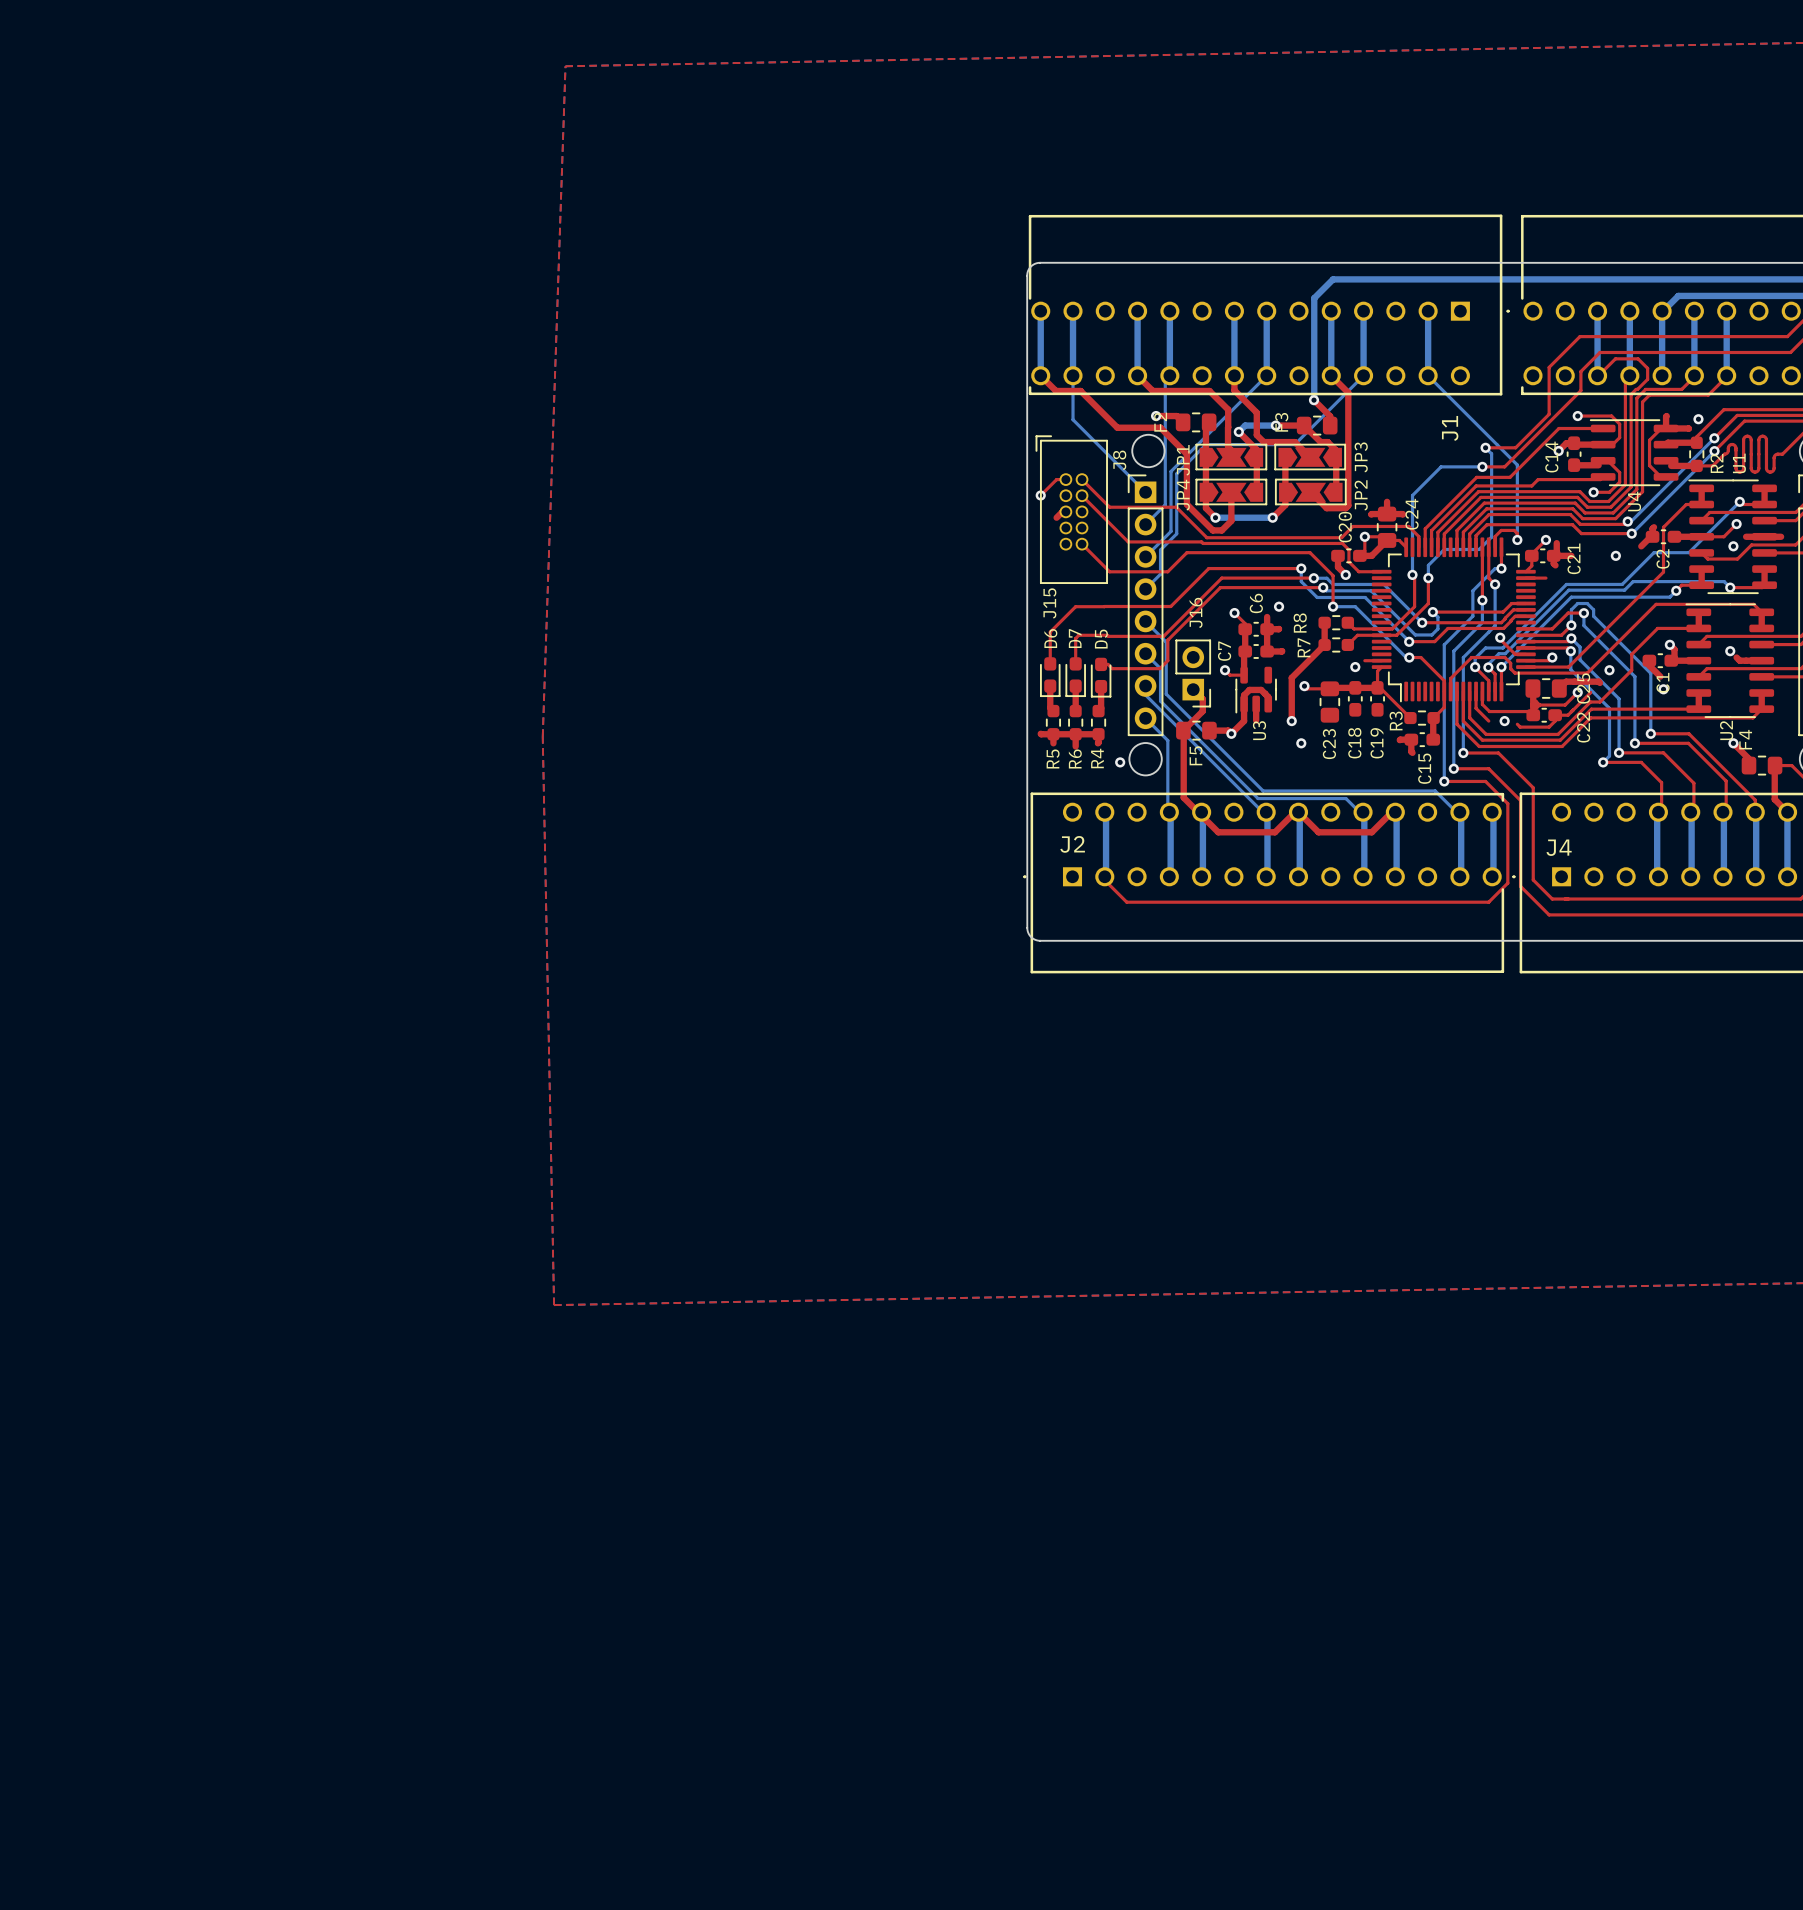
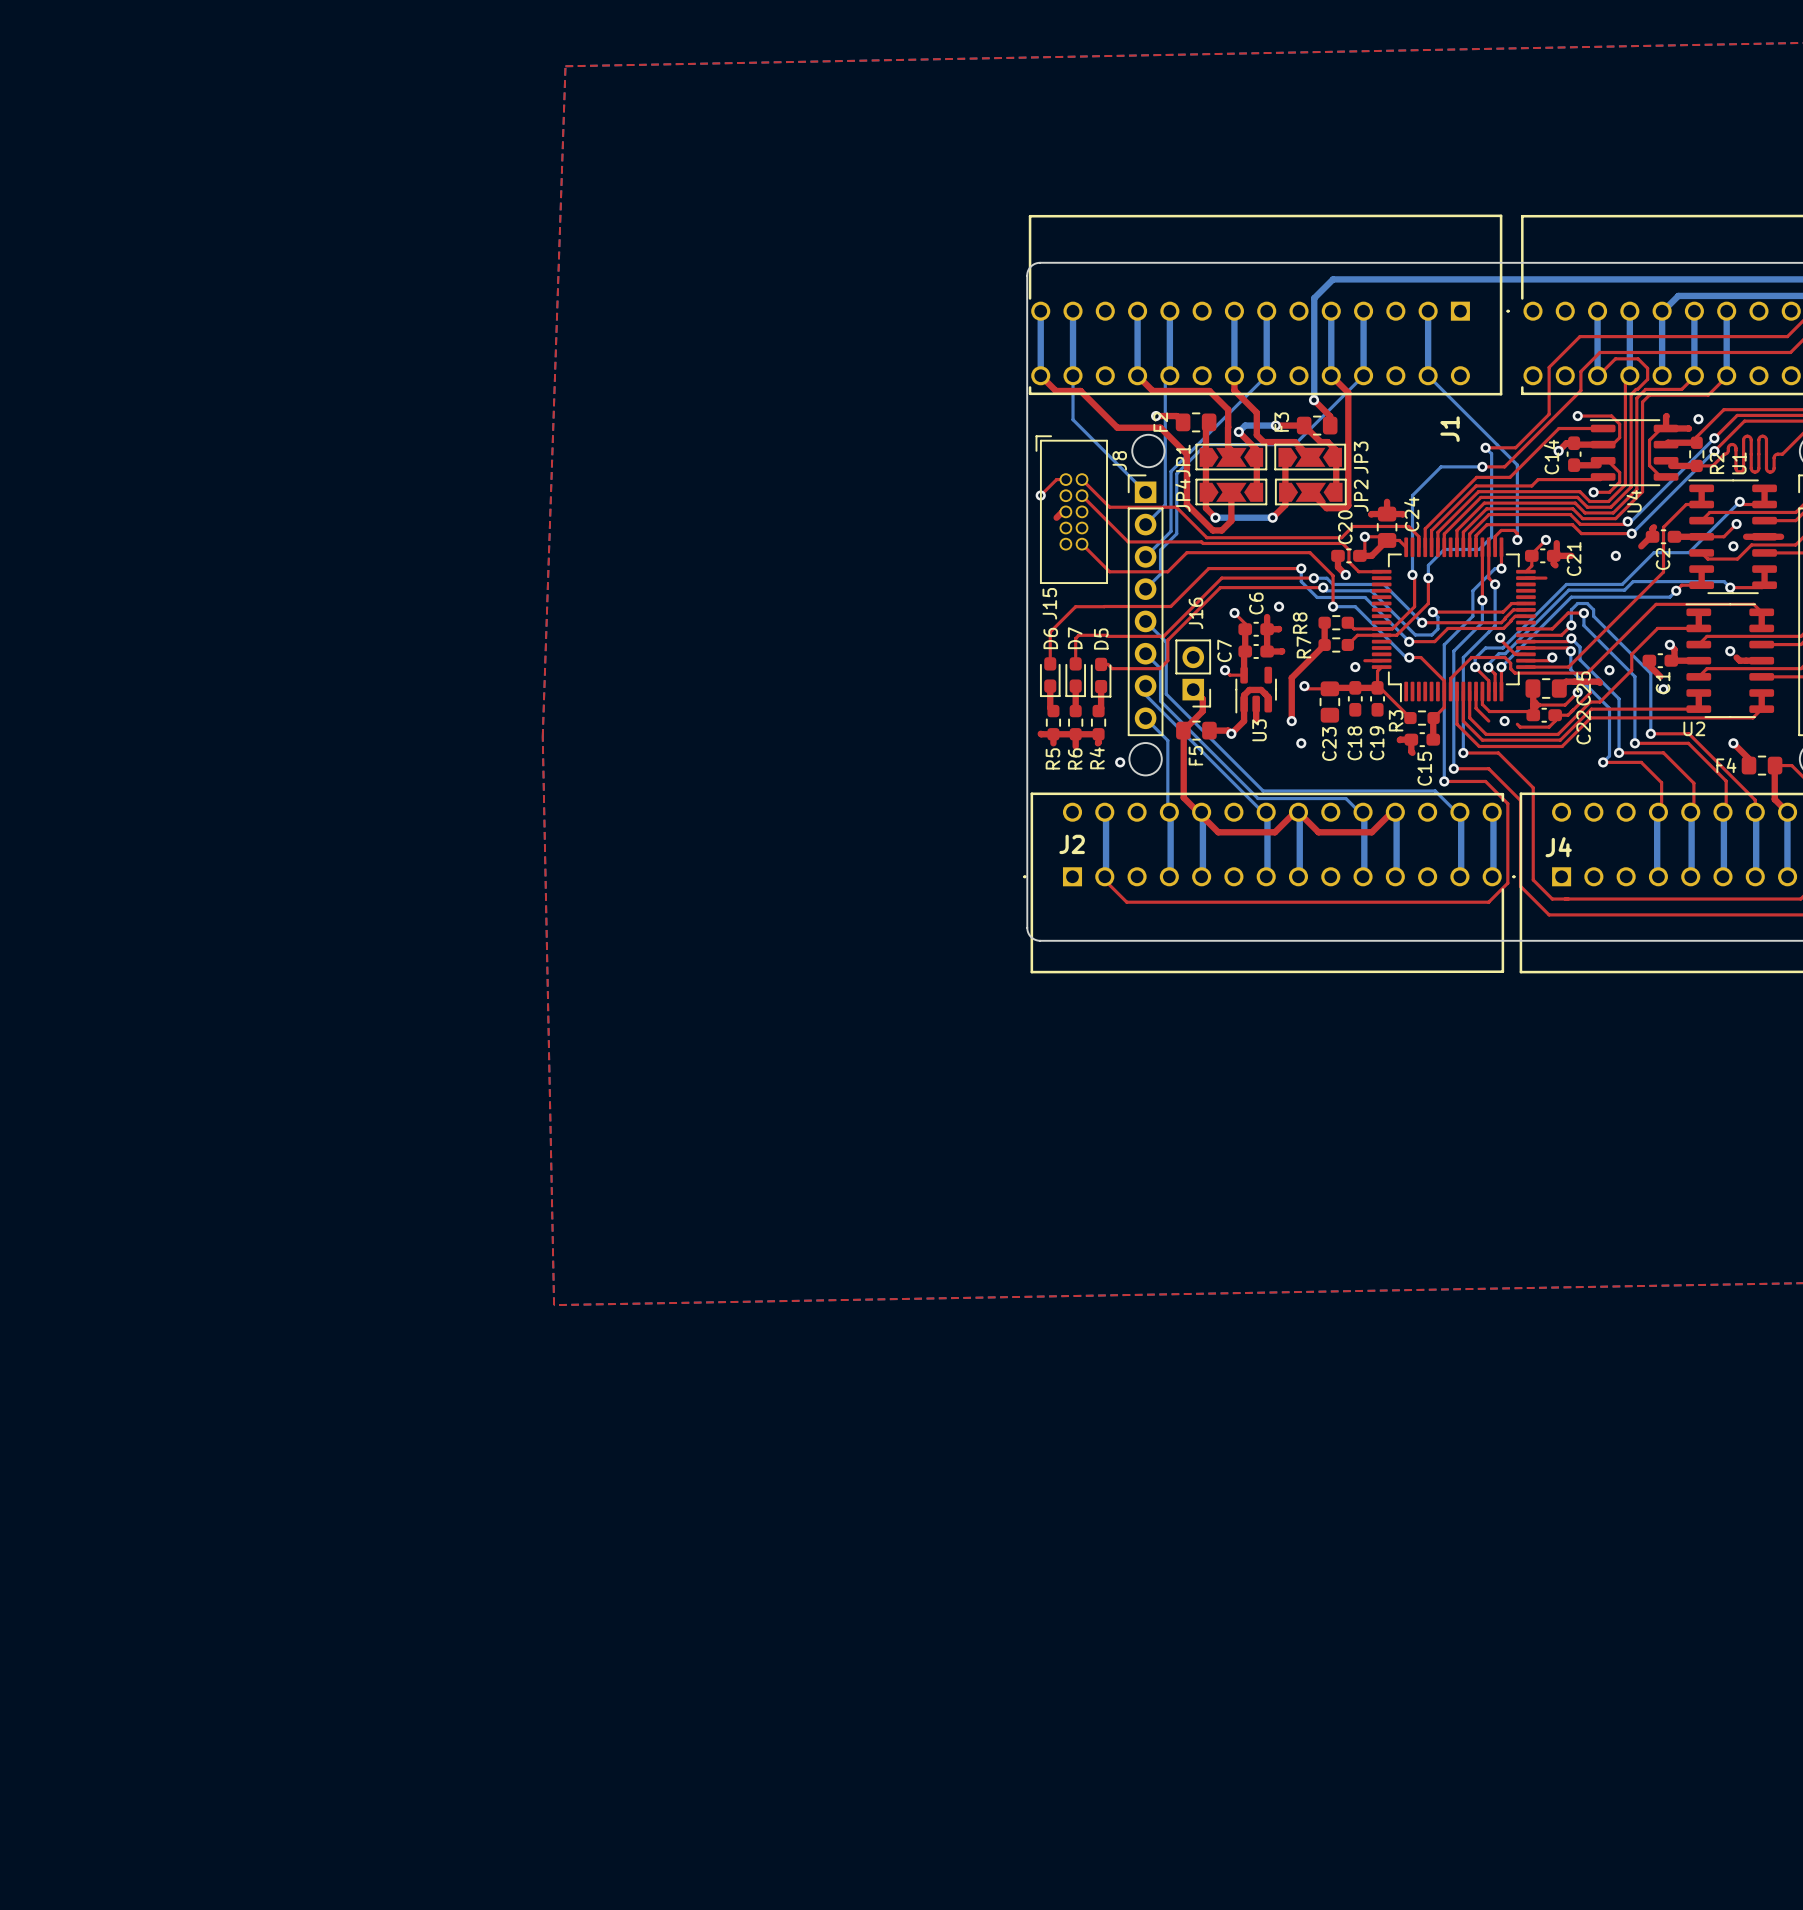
U2 name rotation: 0° (1726, 730) -> 90° clockwise (1694, 728)
U2 name position: U2 (1726, 730) -> U2 (1694, 728)
F4 name rotation: 0° (1745, 739) -> 90° clockwise (1726, 765)
F4 name position: F4 (1745, 739) -> F4 (1726, 765)

